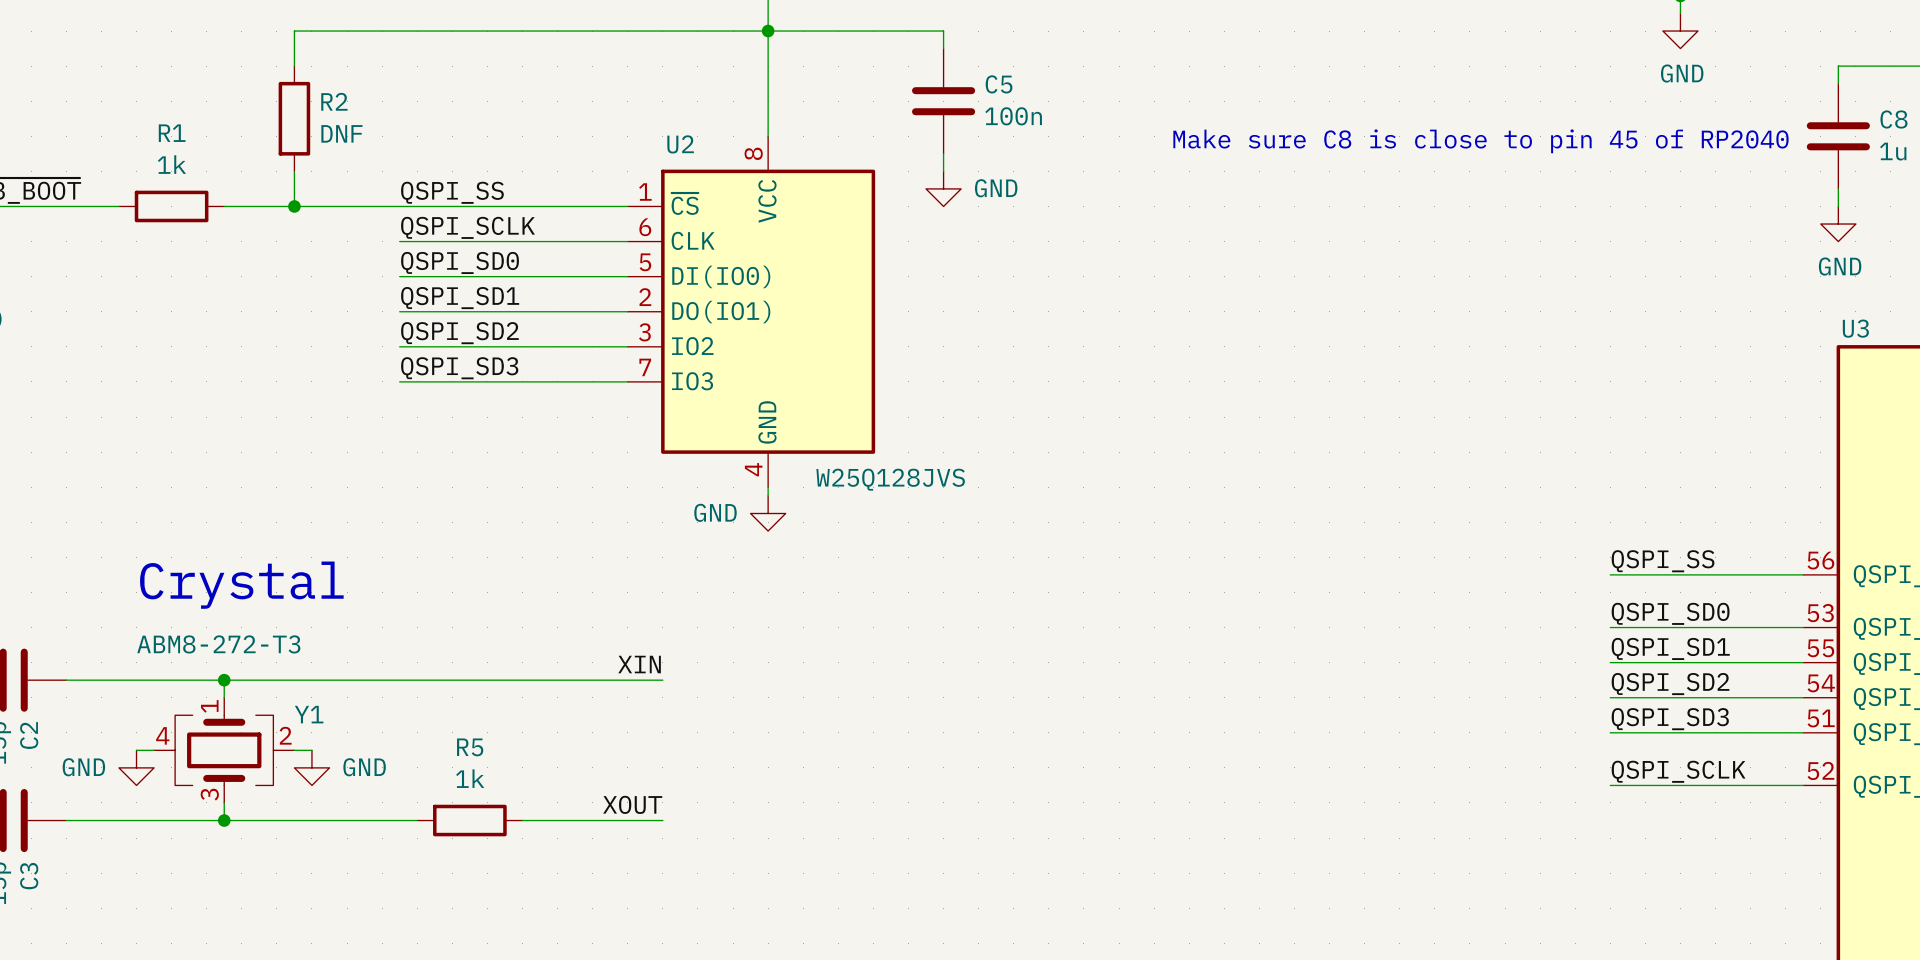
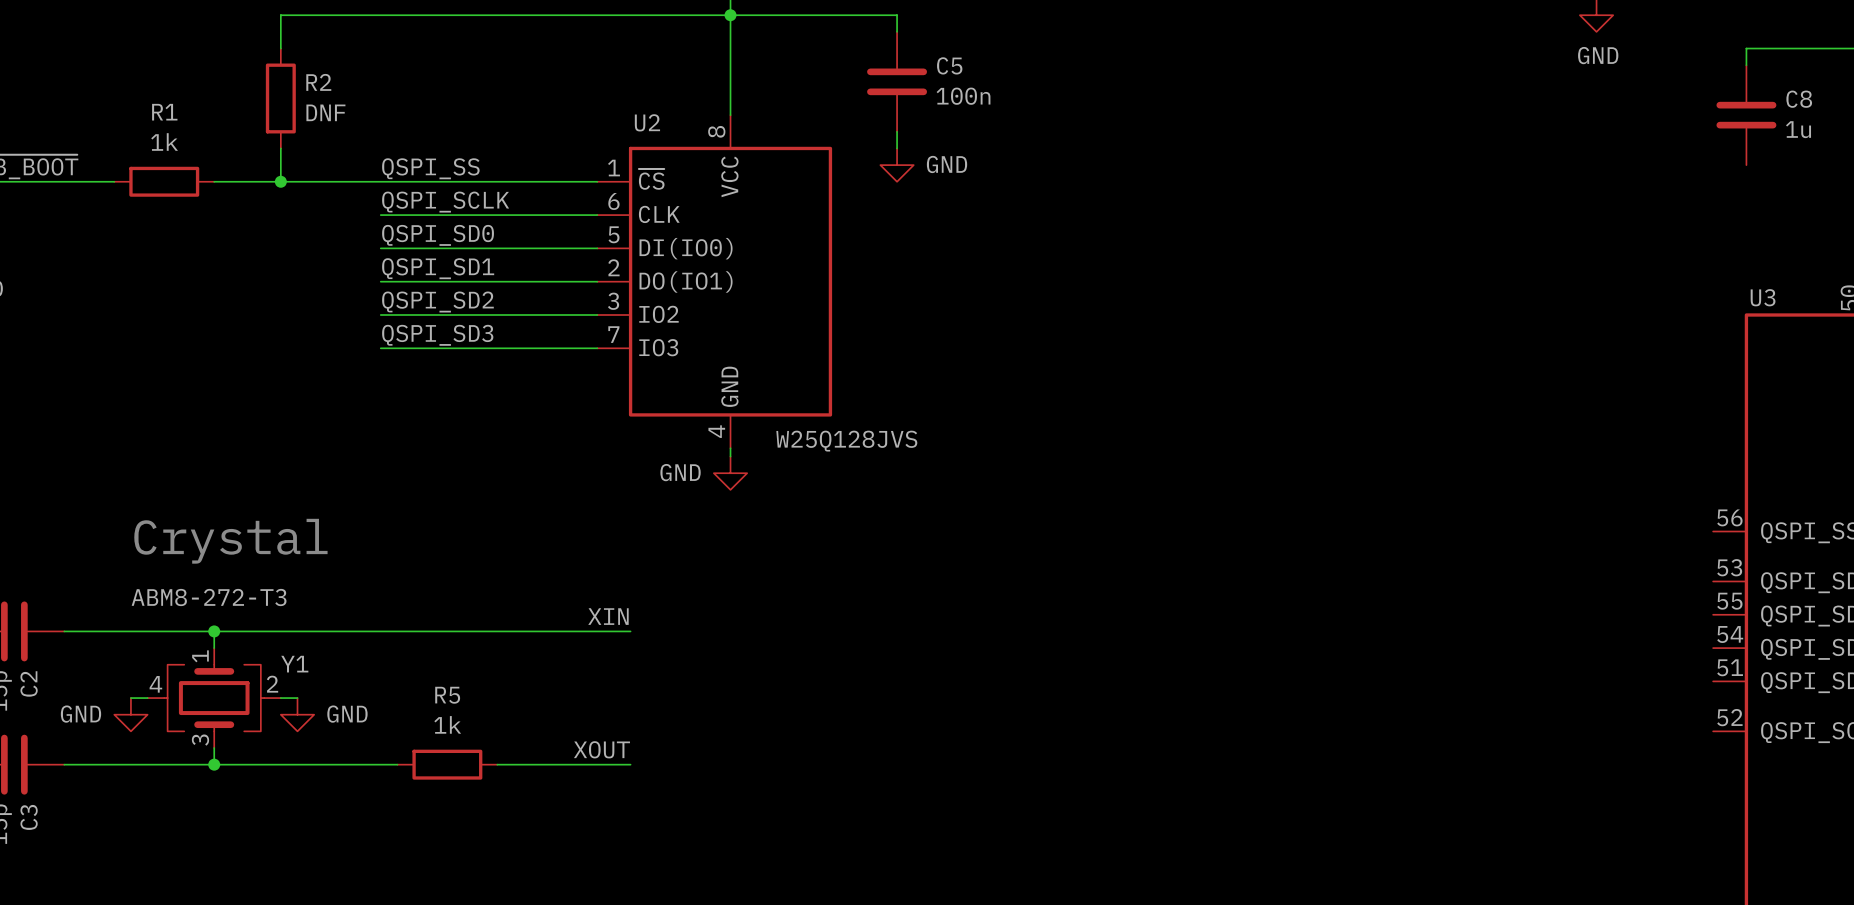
text: Make sure C8 is close to pin 45 of RP2040 (1480, 141) -> none
wire: (1838, 188) (1838, 206) -> none
power symbol: GND (1838, 224) -> none
label: QSPI_SS (1663, 561) -> none
wire: (1610, 574) (1803, 574) -> none
label: QSPI_SD0 (1670, 613) -> none
wire: (1610, 627) (1803, 627) -> none
label: QSPI_SD1 (1670, 648) -> none
wire: (1610, 662) (1803, 662) -> none
label: QSPI_SD2 (1670, 684) -> none
wire: (1610, 697) (1803, 697) -> none
label: QSPI_SD3 (1670, 719) -> none
wire: (1610, 732) (1803, 732) -> none
label: QSPI_SCLK (1678, 771) -> none
wire: (1610, 785) (1803, 785) -> none

